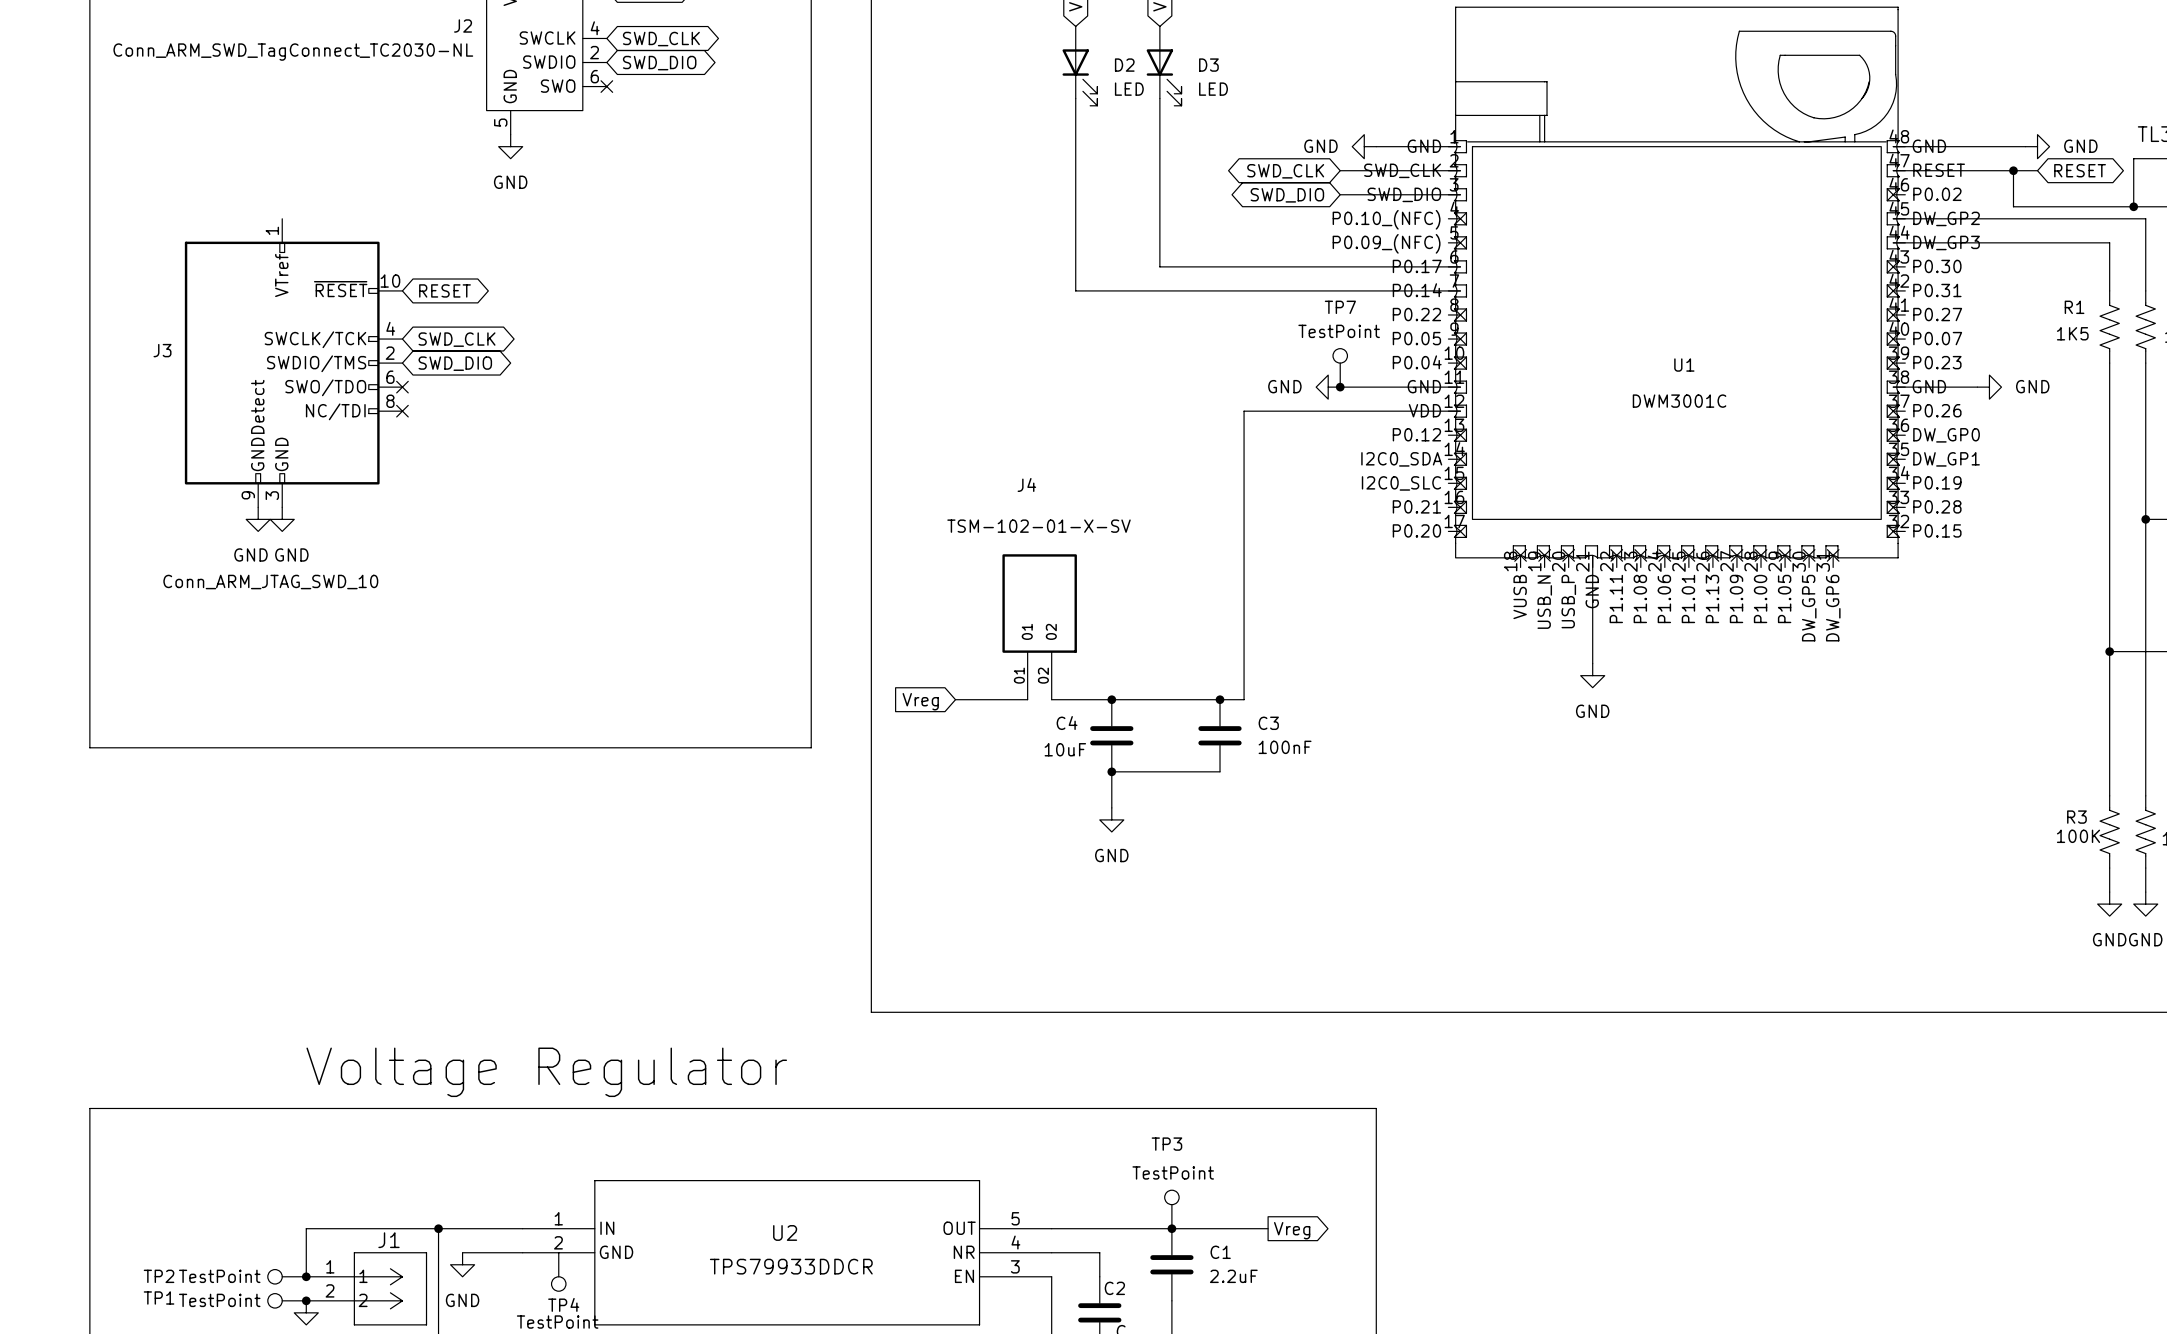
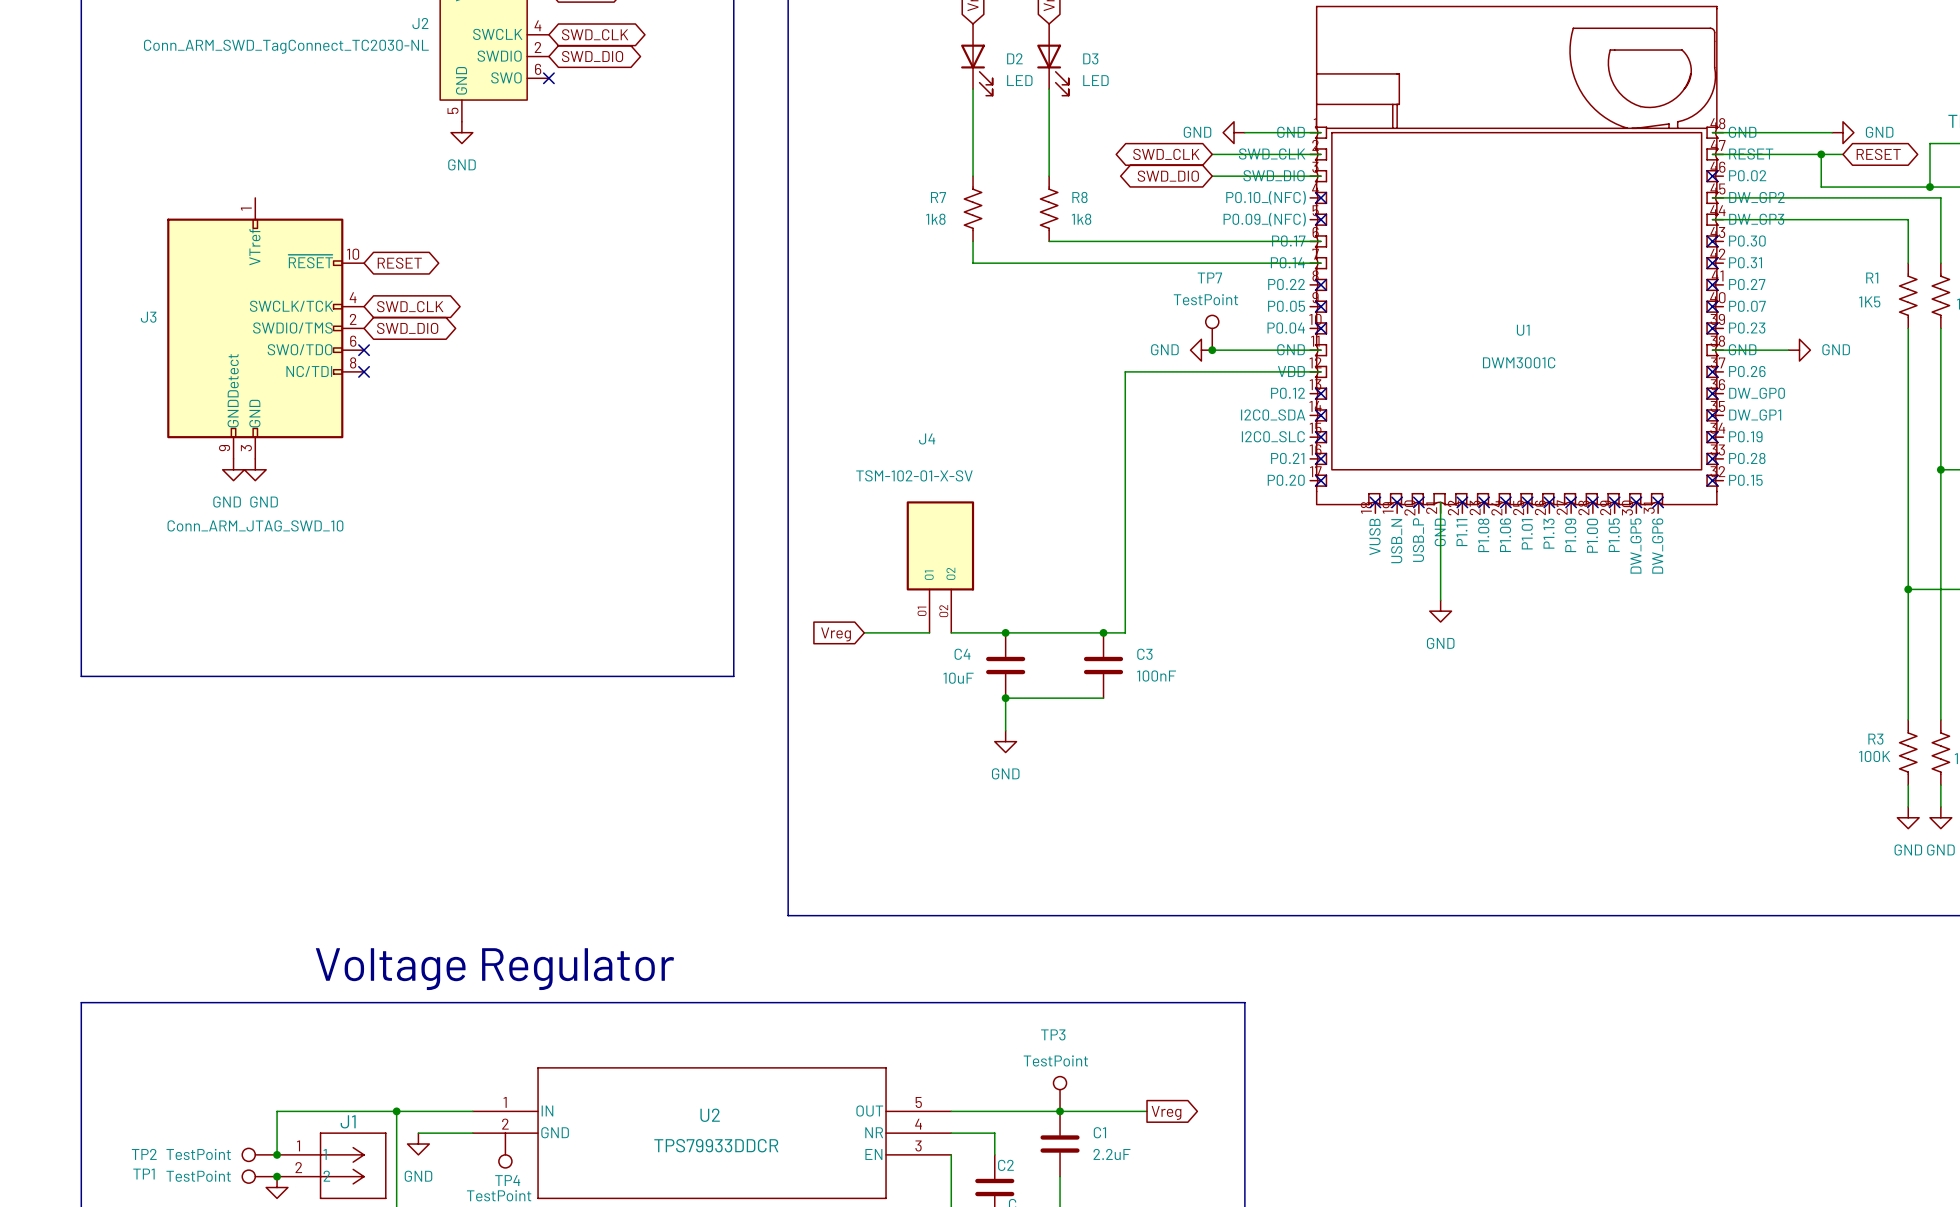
R7: none -> 1k8 (973, 208)
R8: none -> 1k8 (1049, 208)

